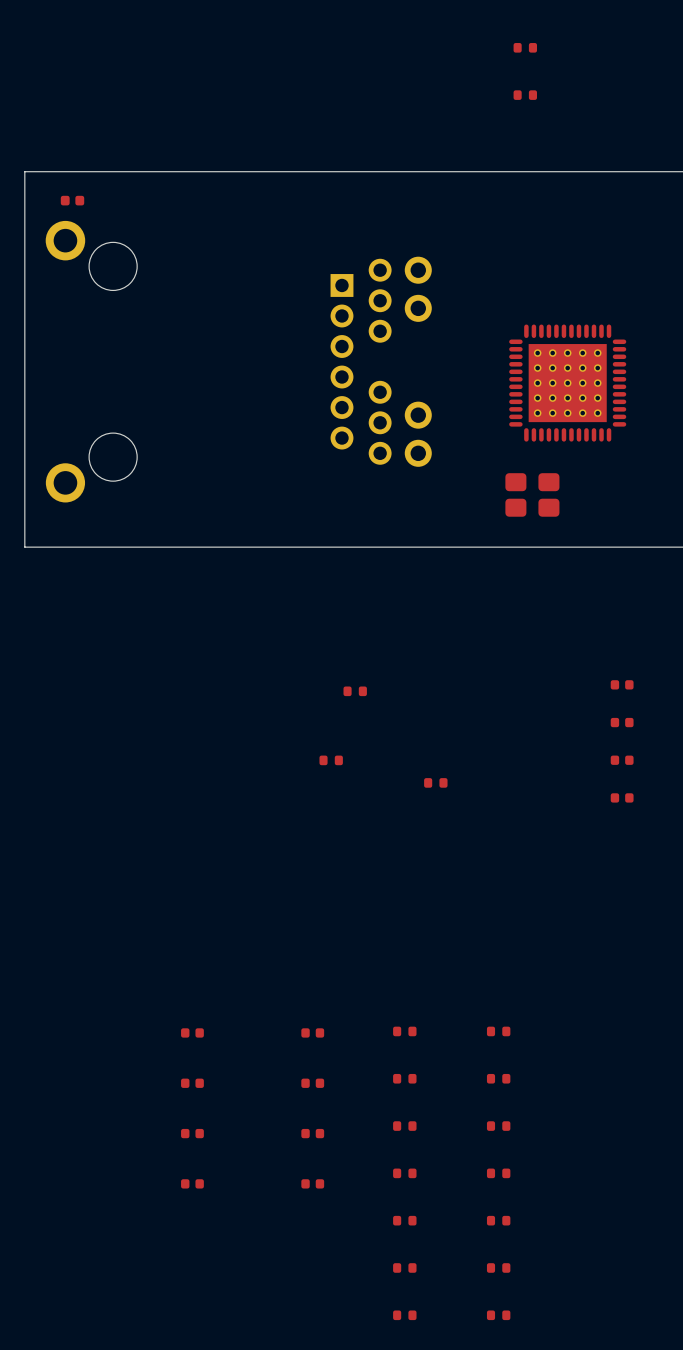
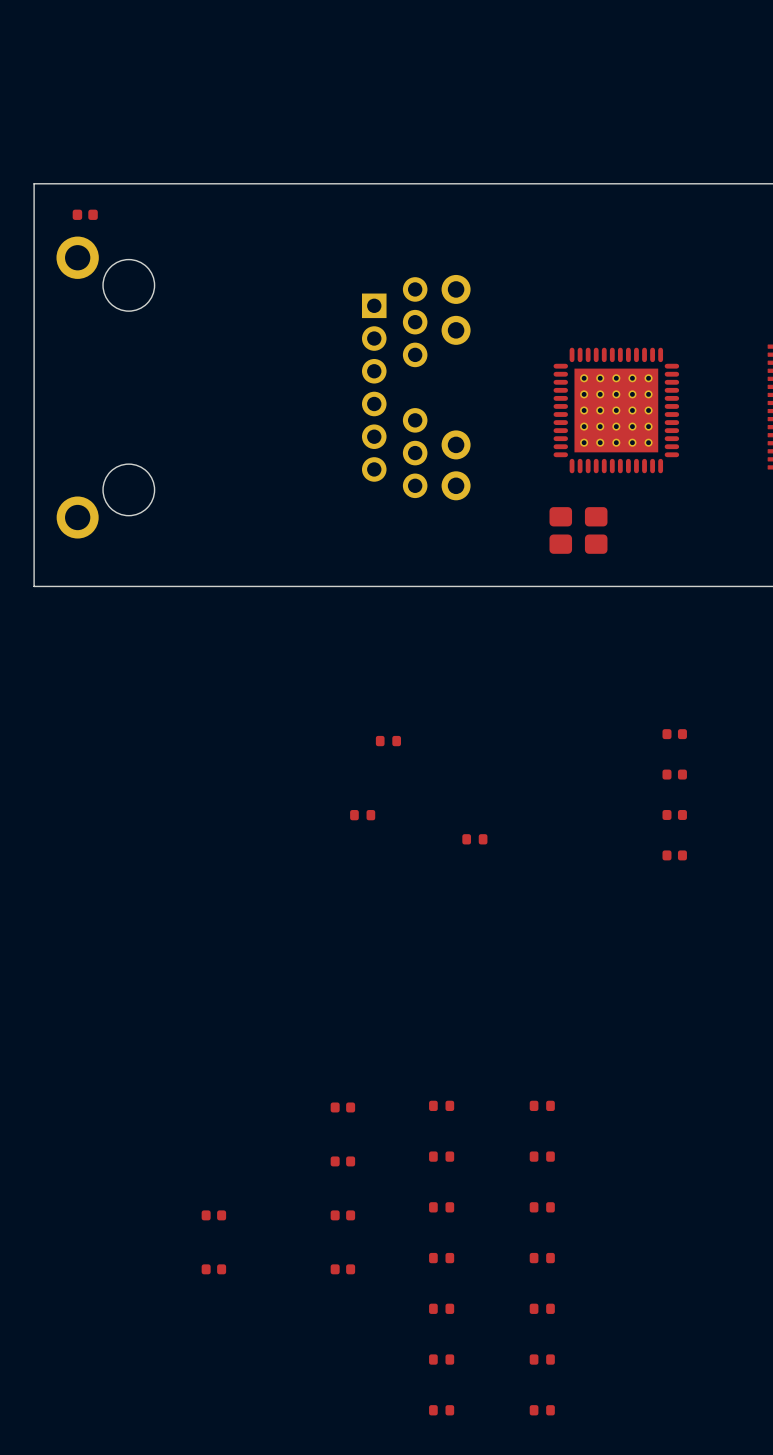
part: (525, 47) -> none
part: (525, 95) -> none
part: (192, 1032) -> none
part: (192, 1083) -> none

